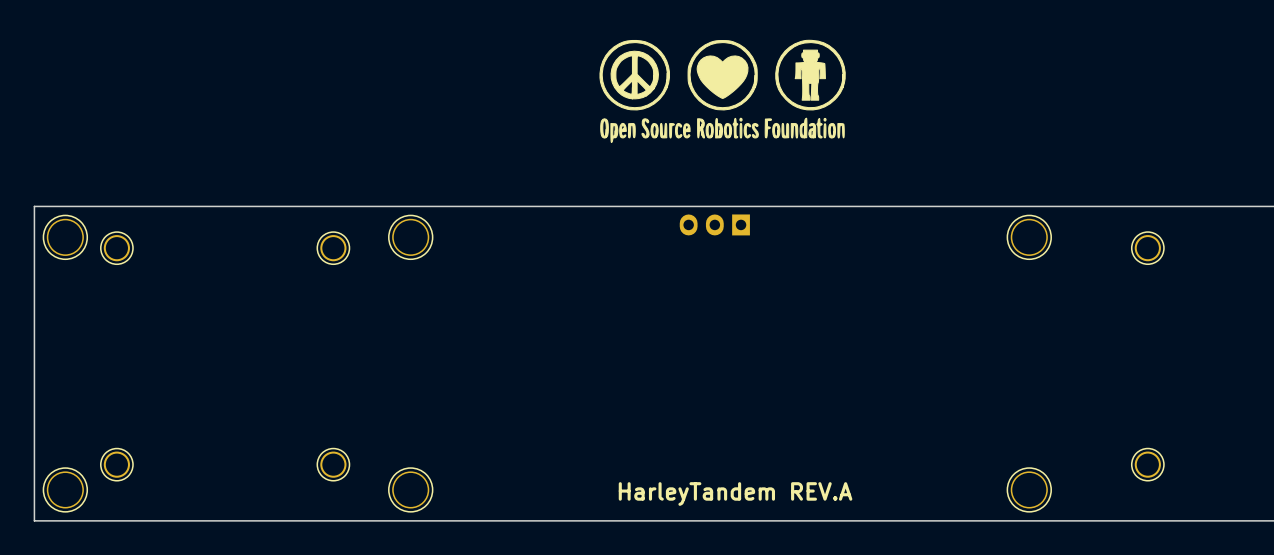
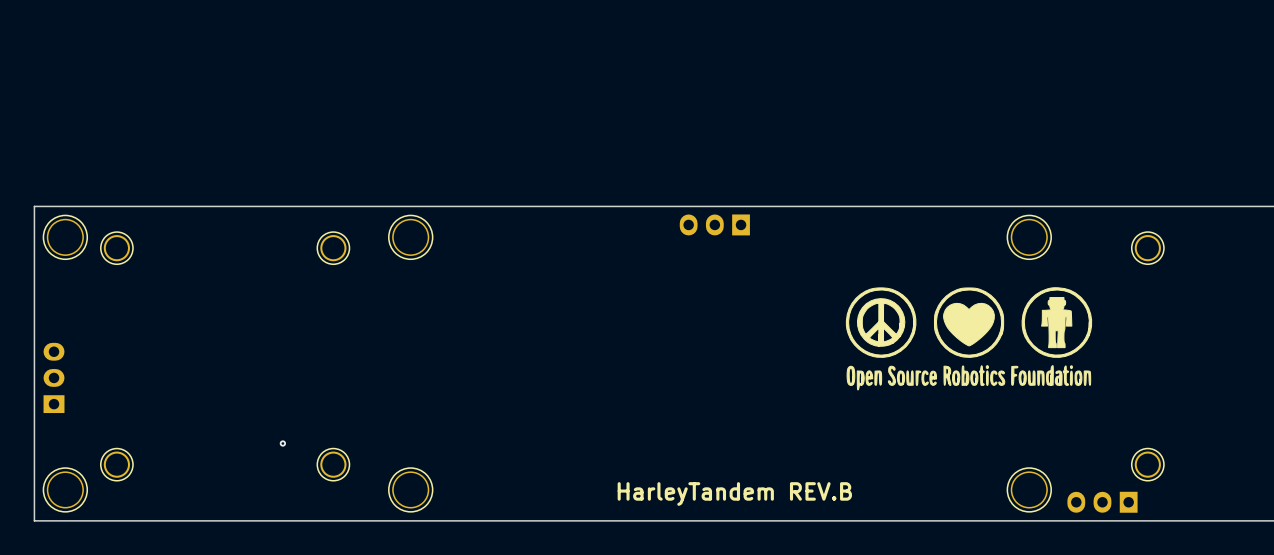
drawing: [599, 39, 846, 144] -> none
drawing: none -> [845, 287, 1093, 391]
part: none -> (54, 377)
via: none -> (282, 443)
text: HarleyTandem REV.A (735, 494) -> HarleyTandem REV.B (734, 494)
part: none -> (1102, 502)

